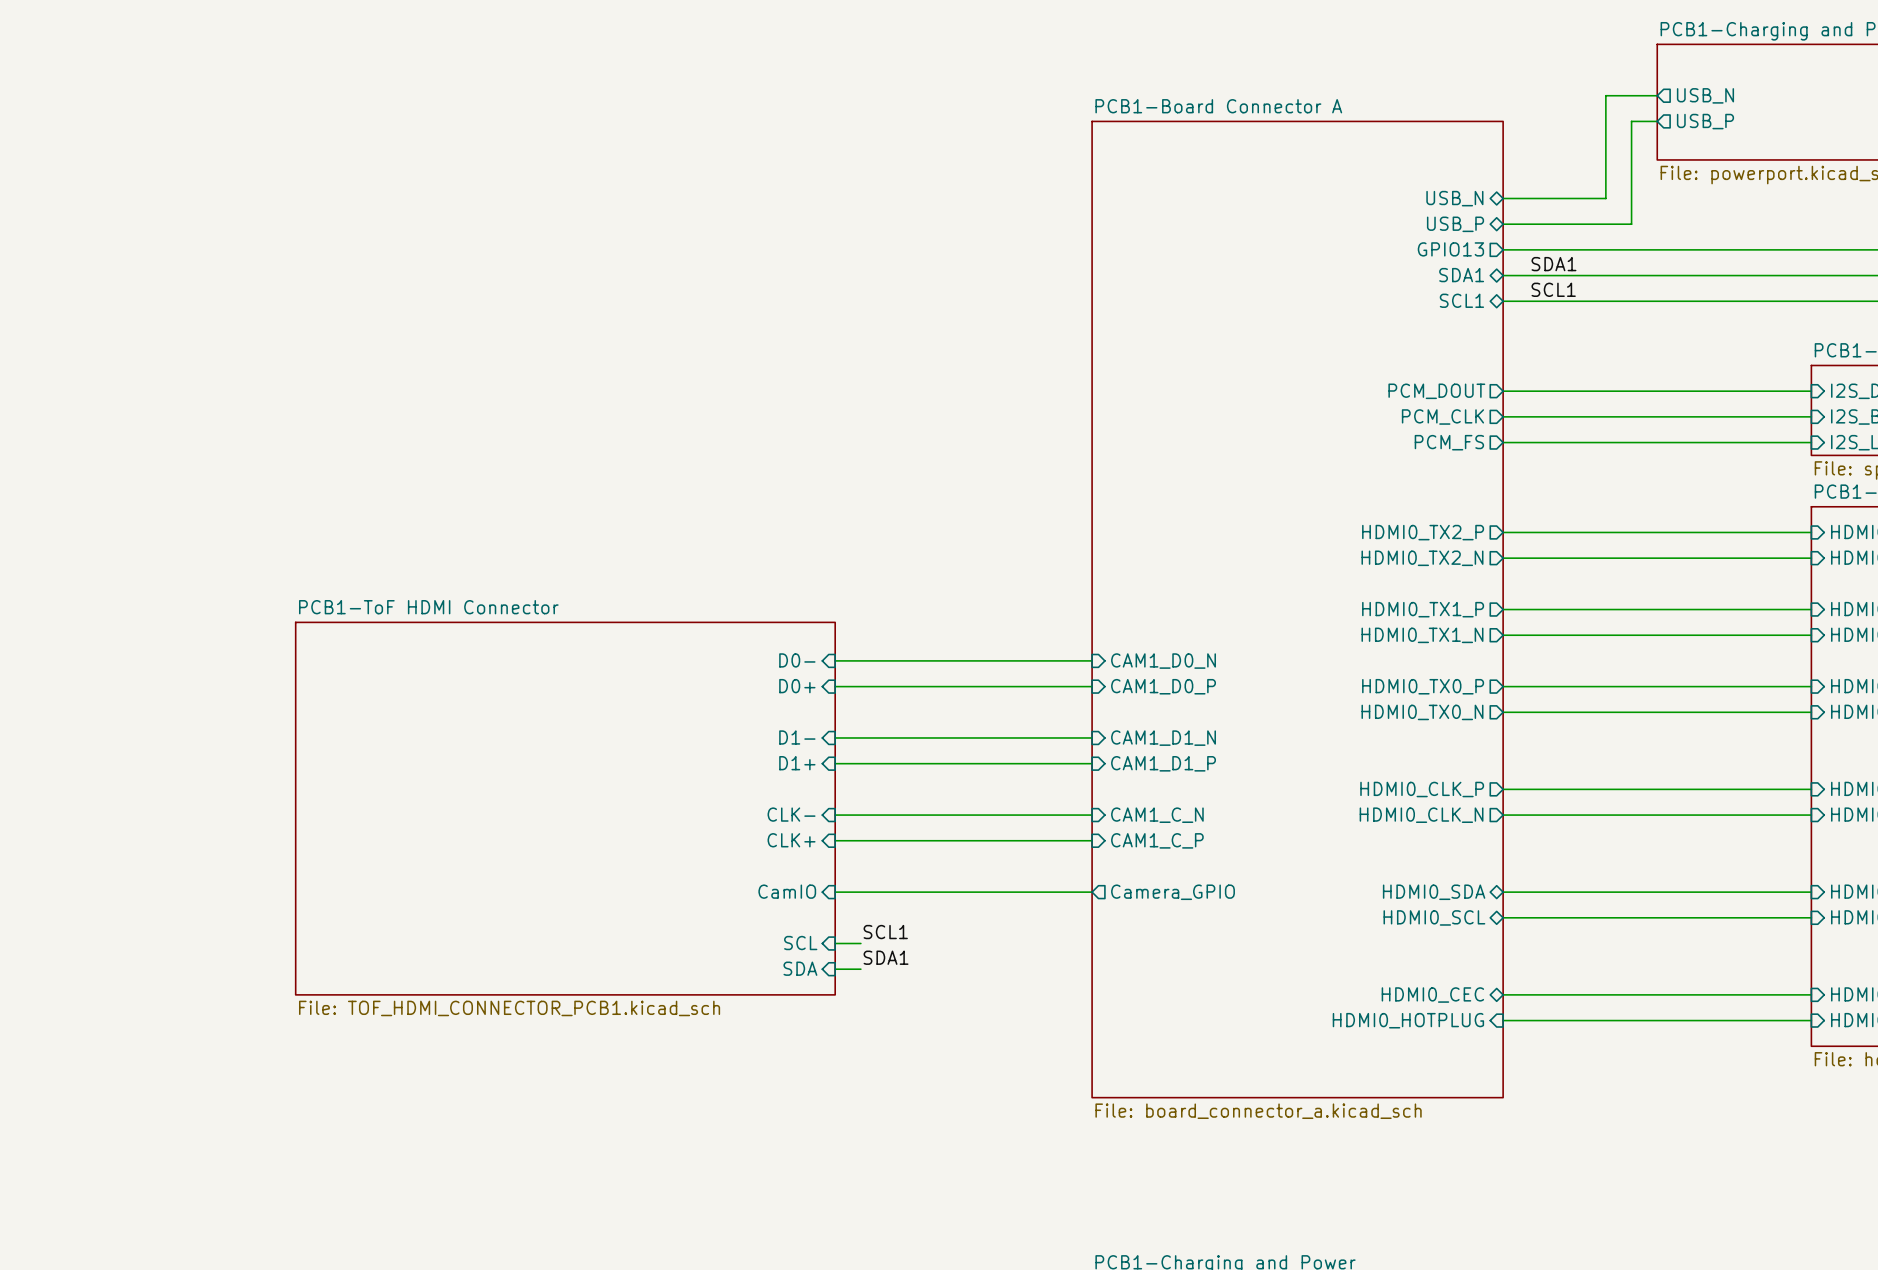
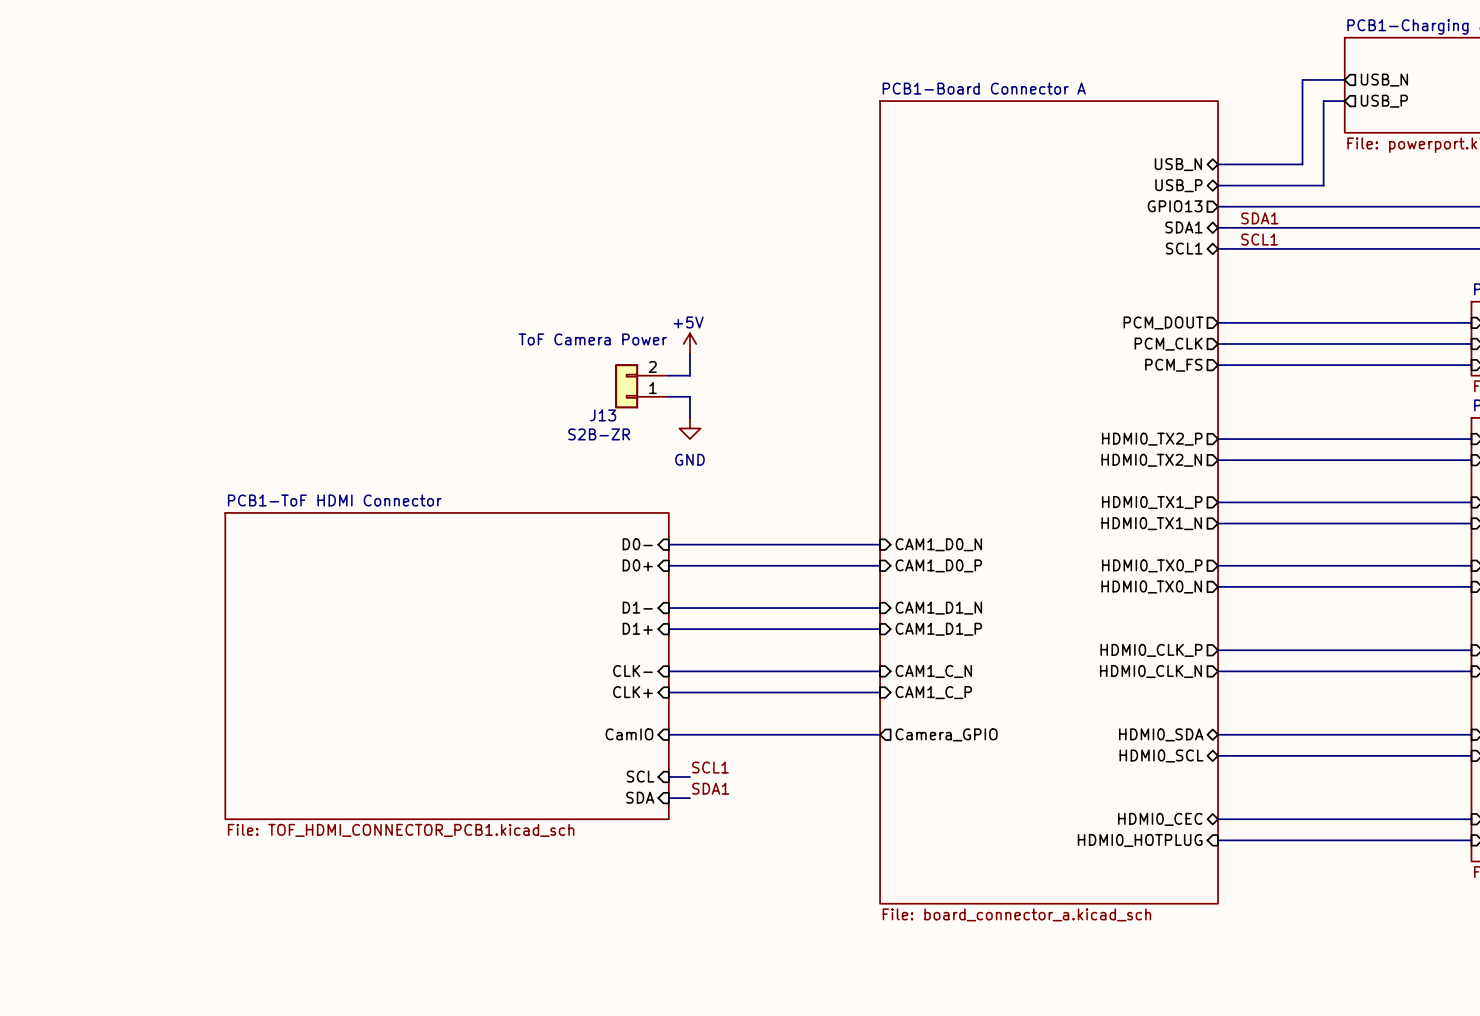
text: none -> ToF Camera Power (592, 339)
power symbol: none -> +5V (689, 343)
wire: none -> (689, 354) (689, 375) (668, 375)
J13: none -> S2B-ZR (641, 386)
wire: none -> (668, 396) (689, 396) (689, 417)
power symbol: none -> GND (689, 428)

